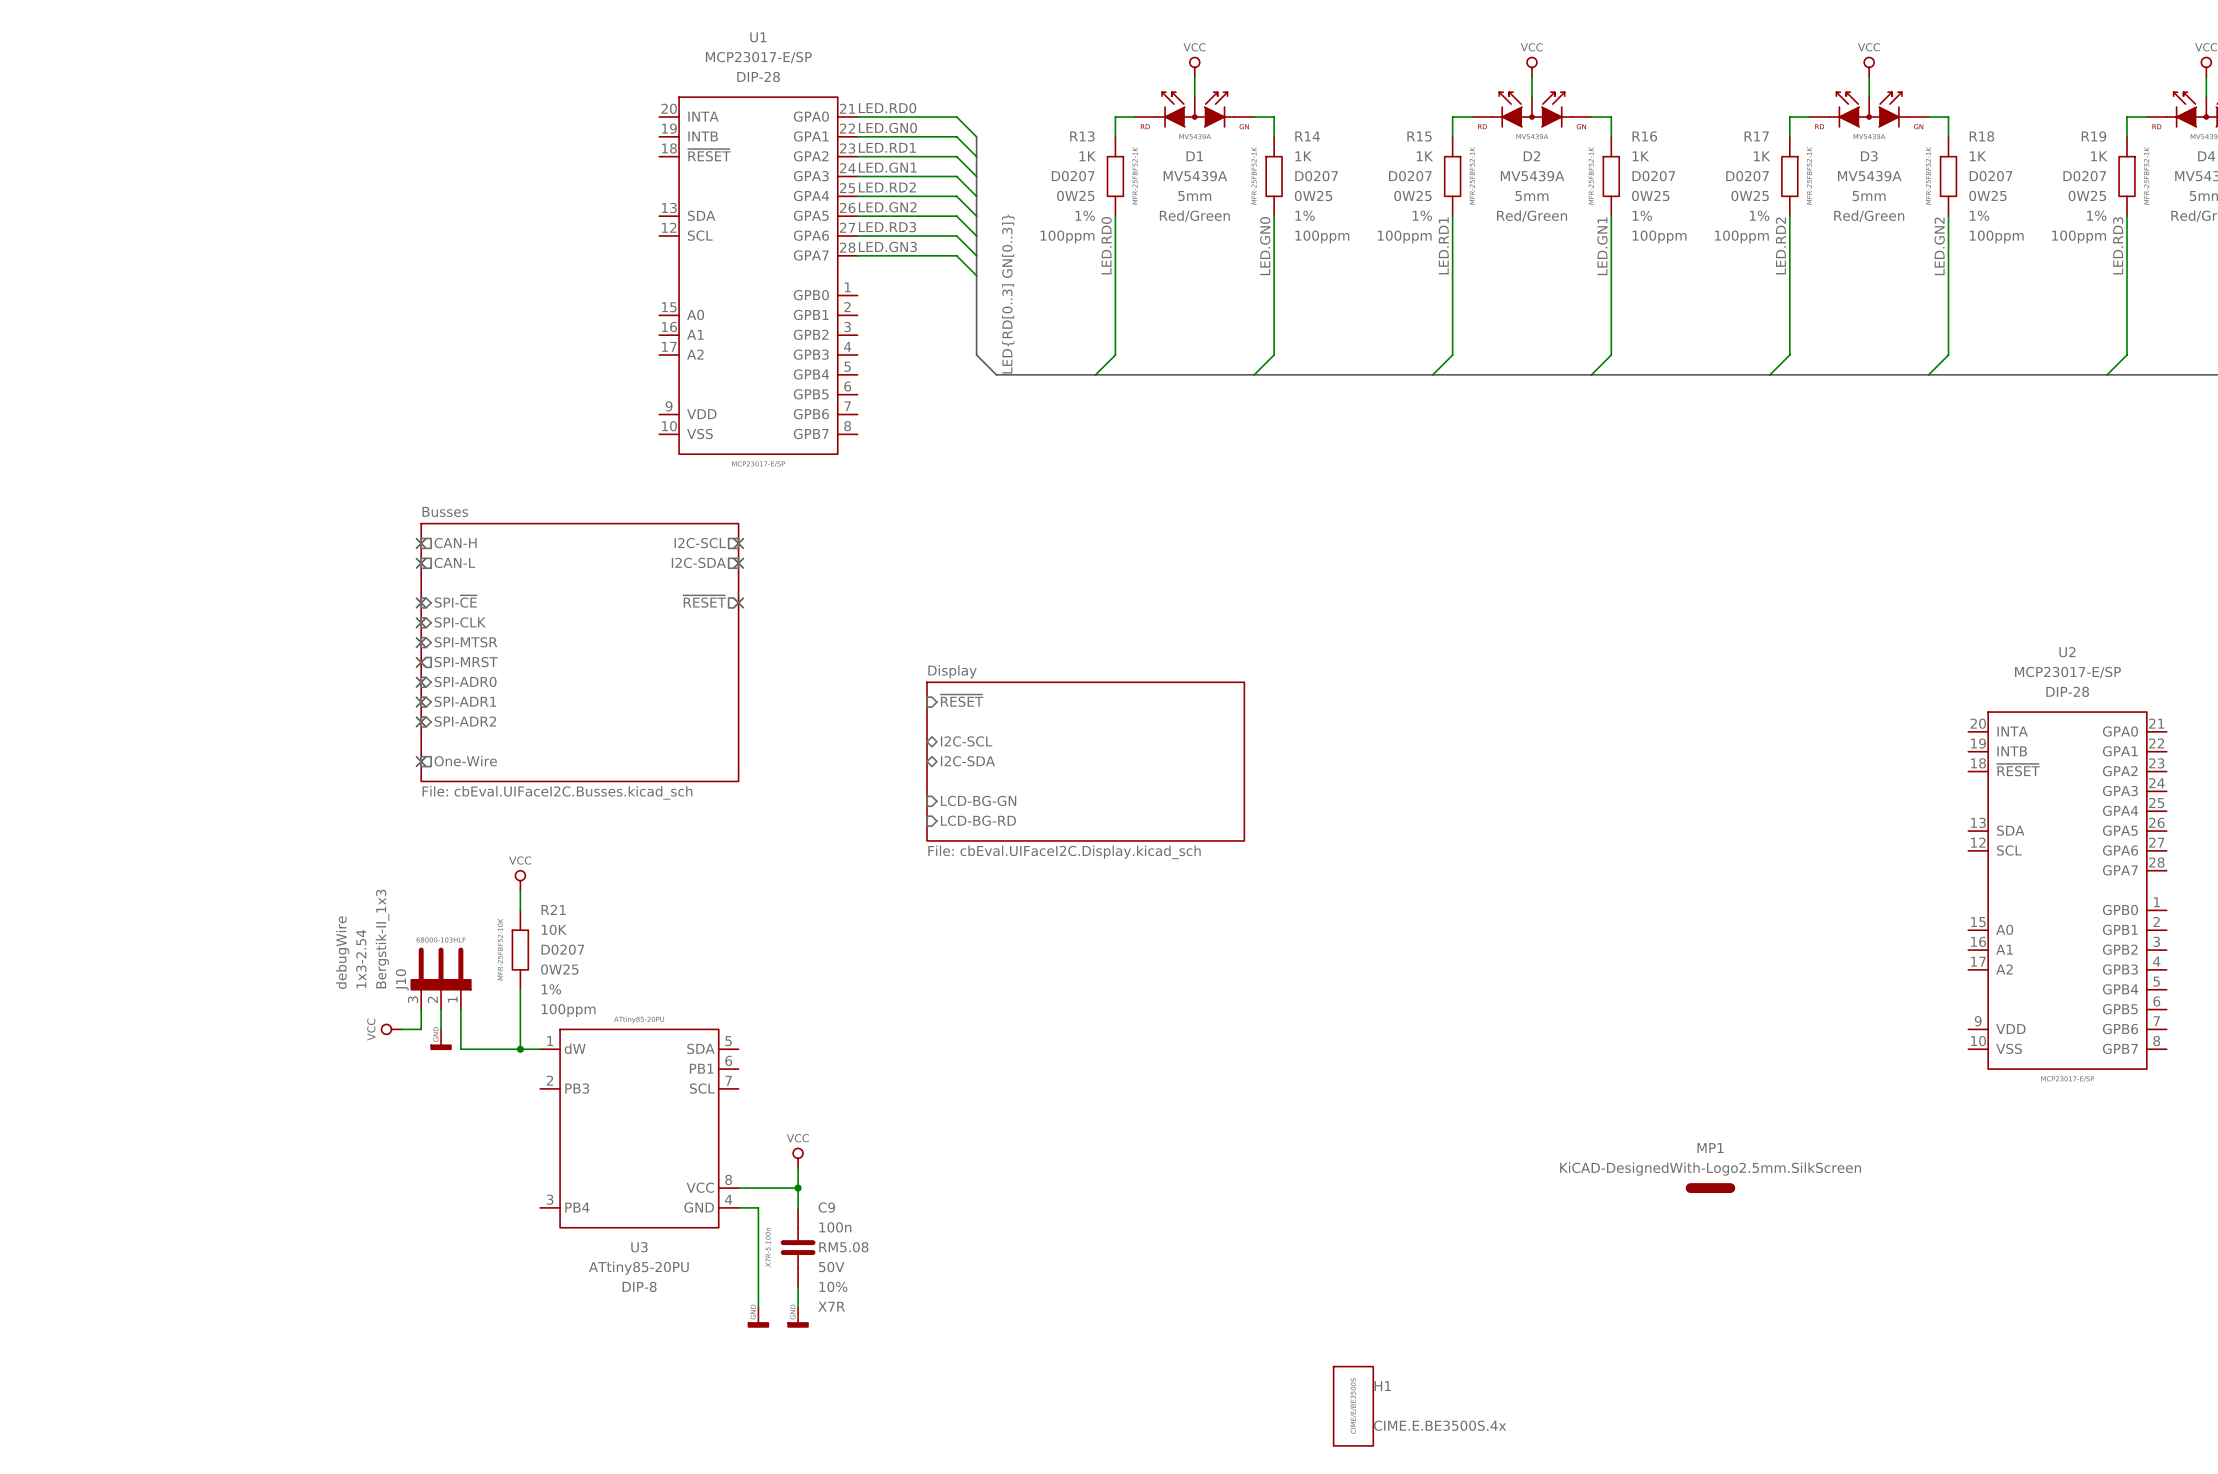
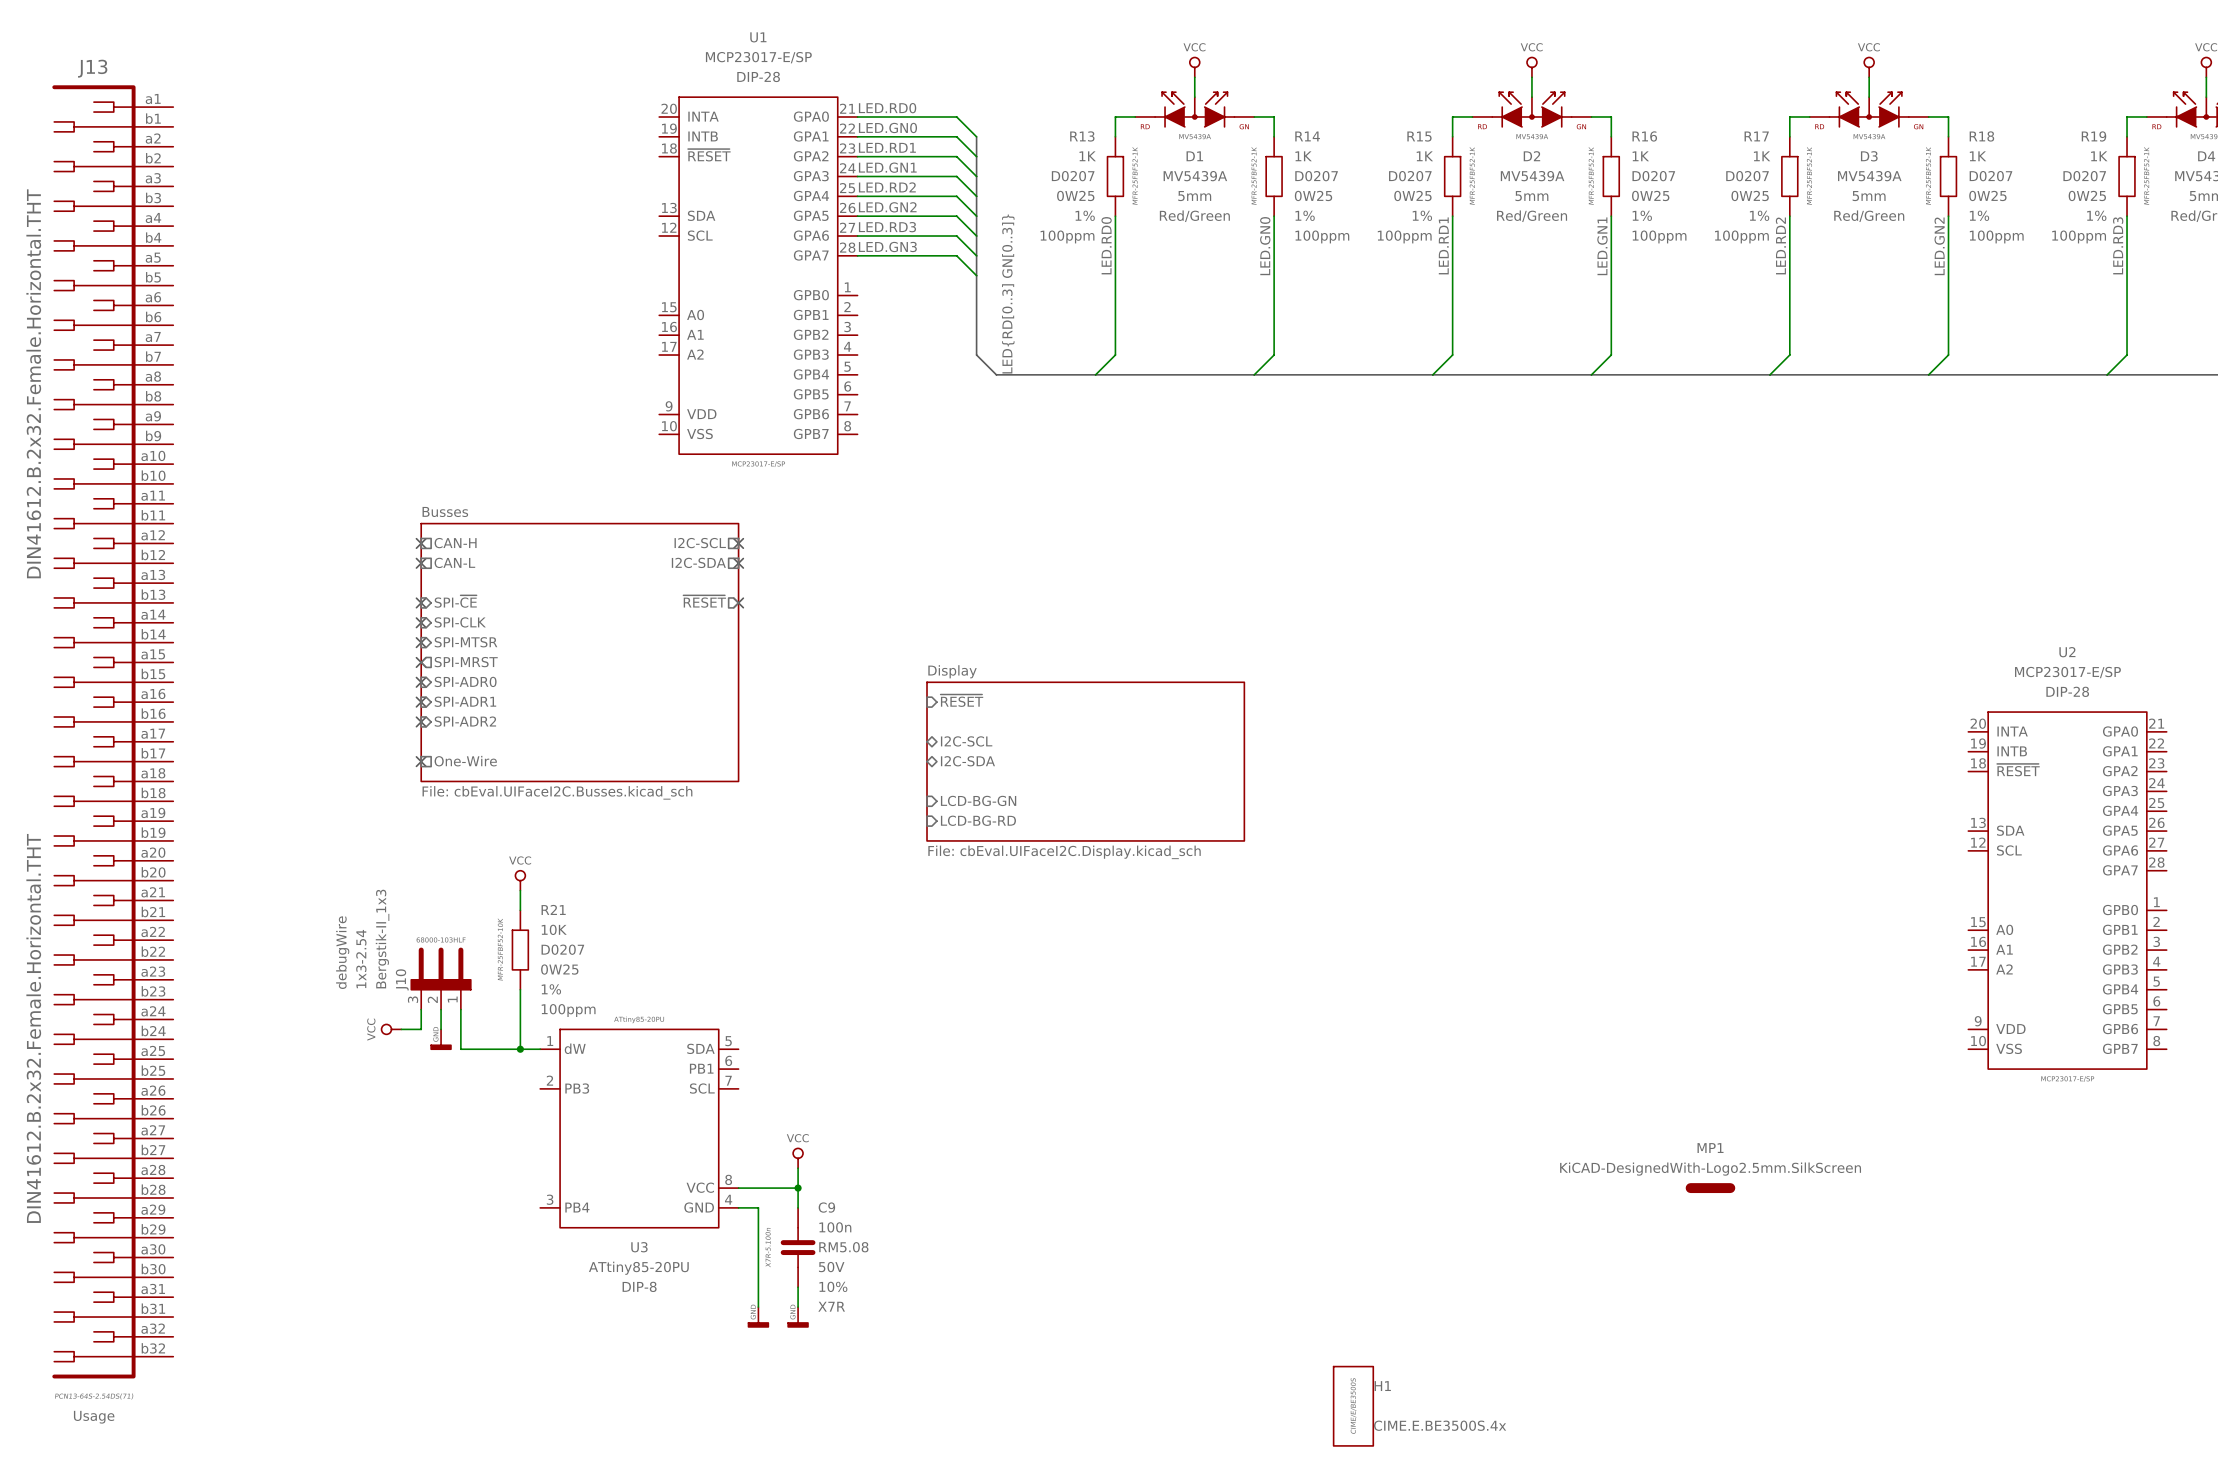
J13: none -> DIN41612.B.2x32.Female.Horizontal.THT (112, 731)

